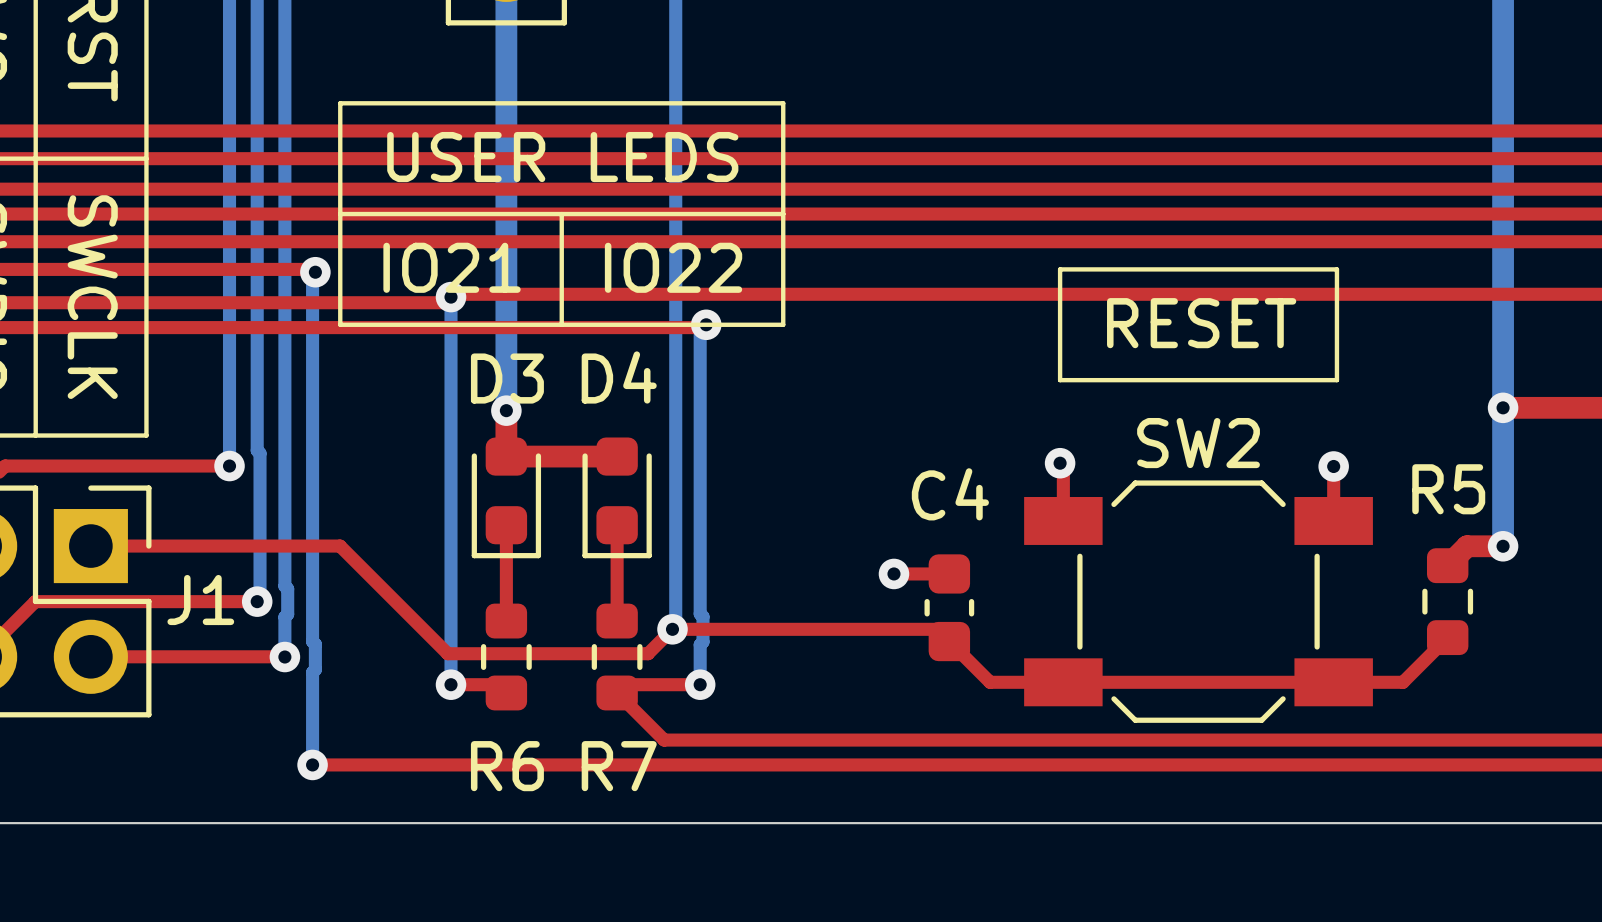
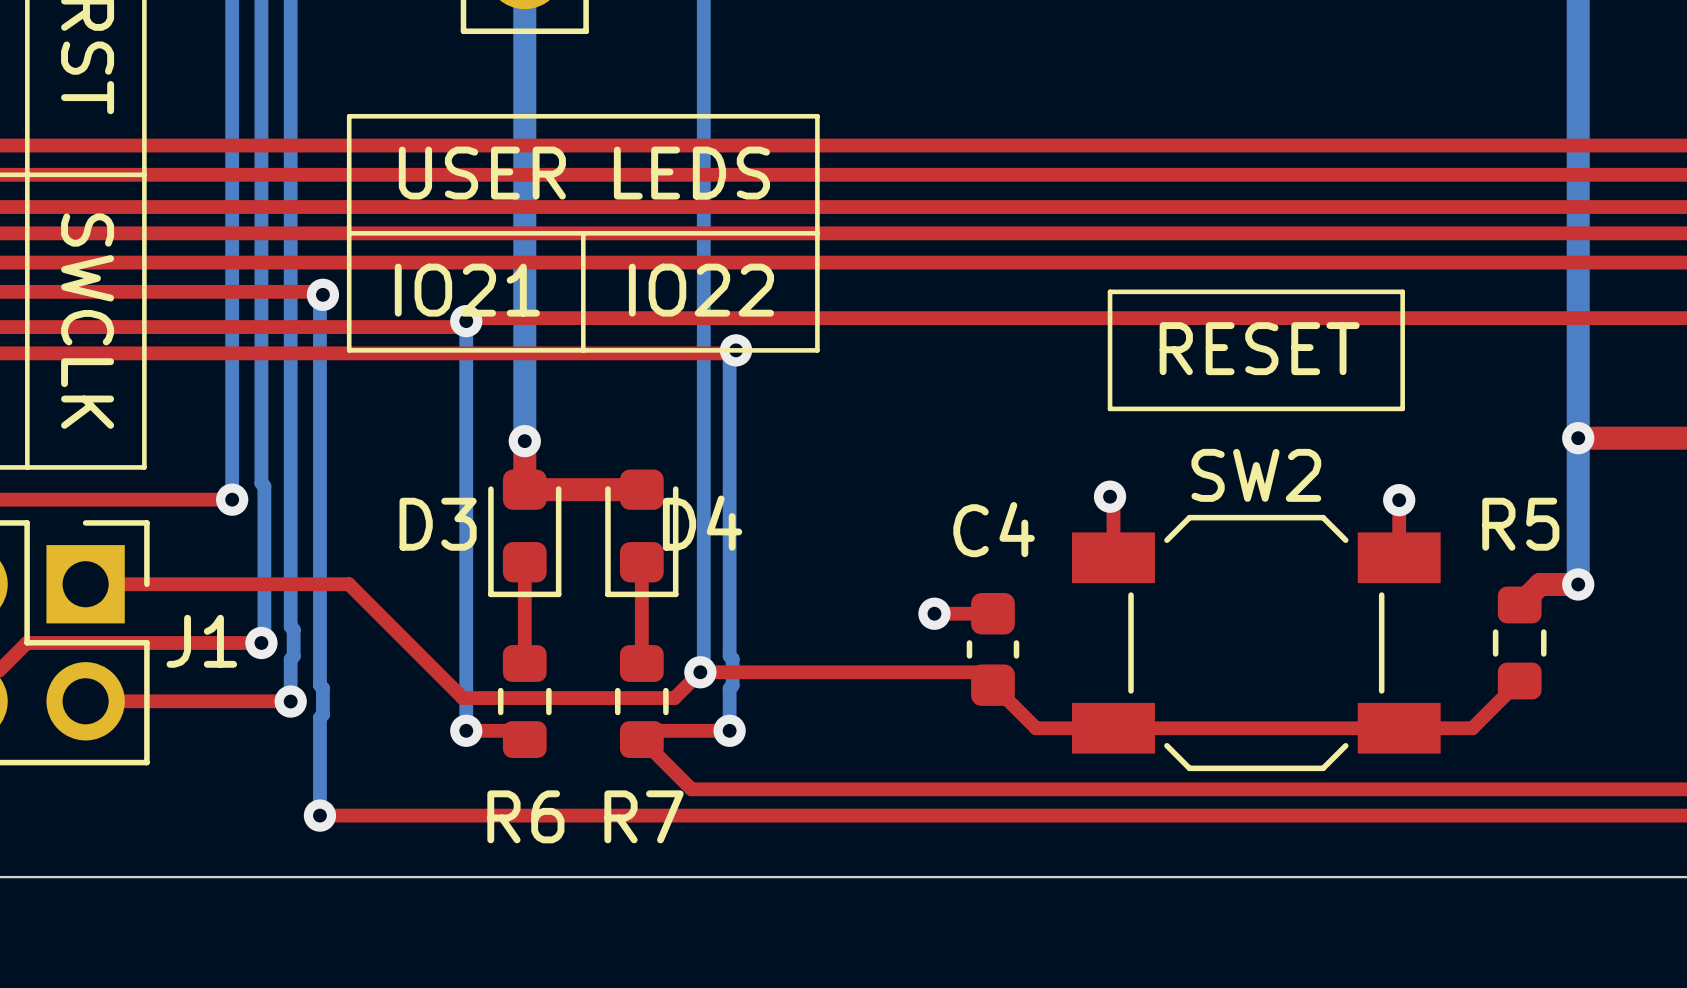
D4 name position: D4 (619, 377) -> D4 (702, 523)
D3 name position: D3 (507, 378) -> D3 (438, 524)

